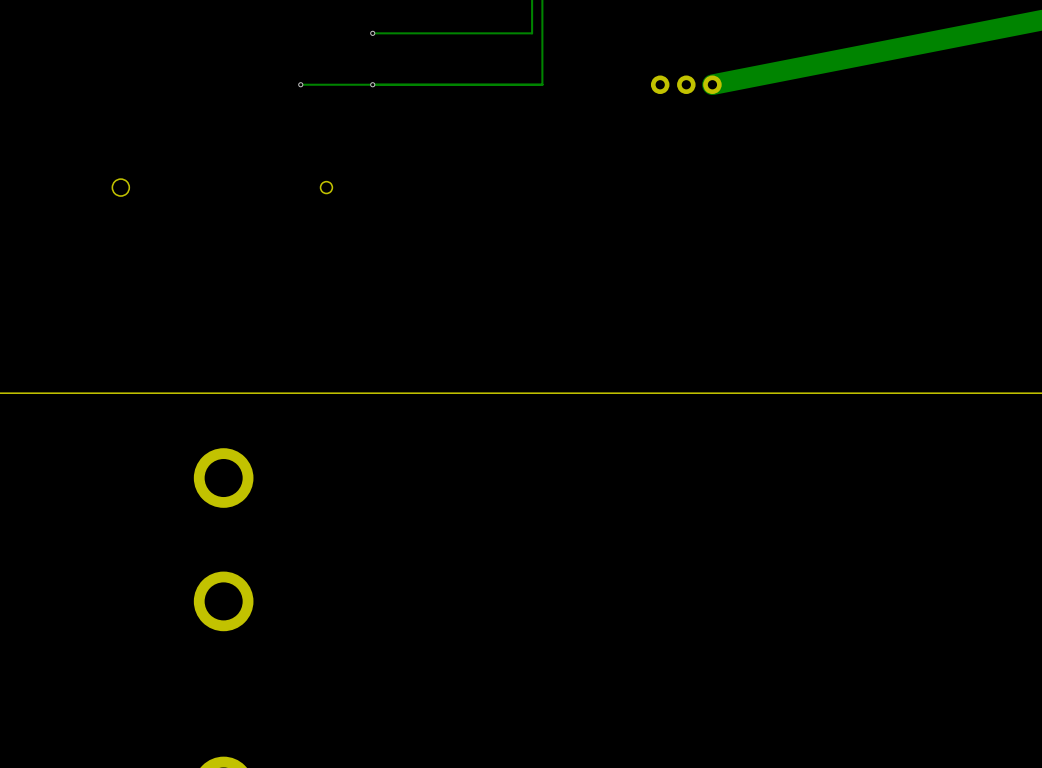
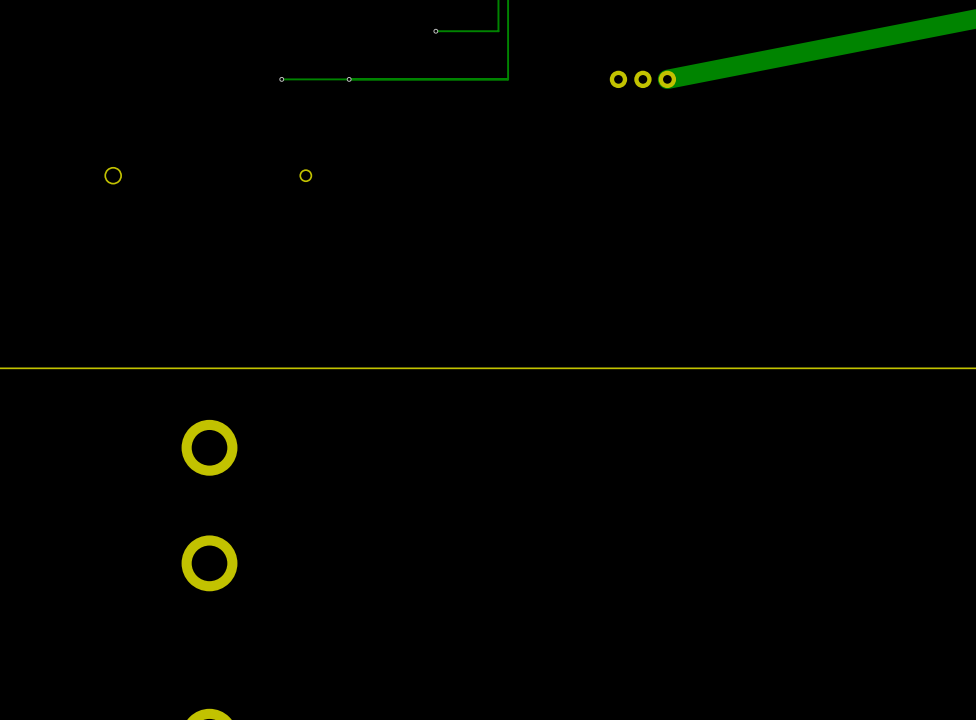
via: (372, 33) -> none
track: (465, 33) (372, 33) -> none
via: none -> (435, 31)

